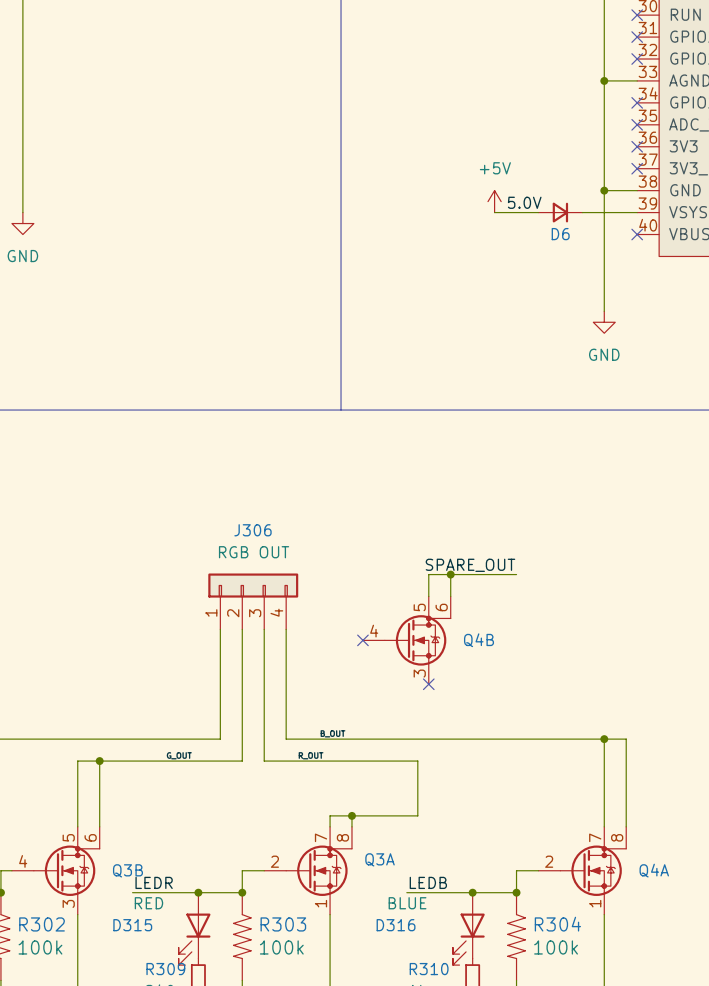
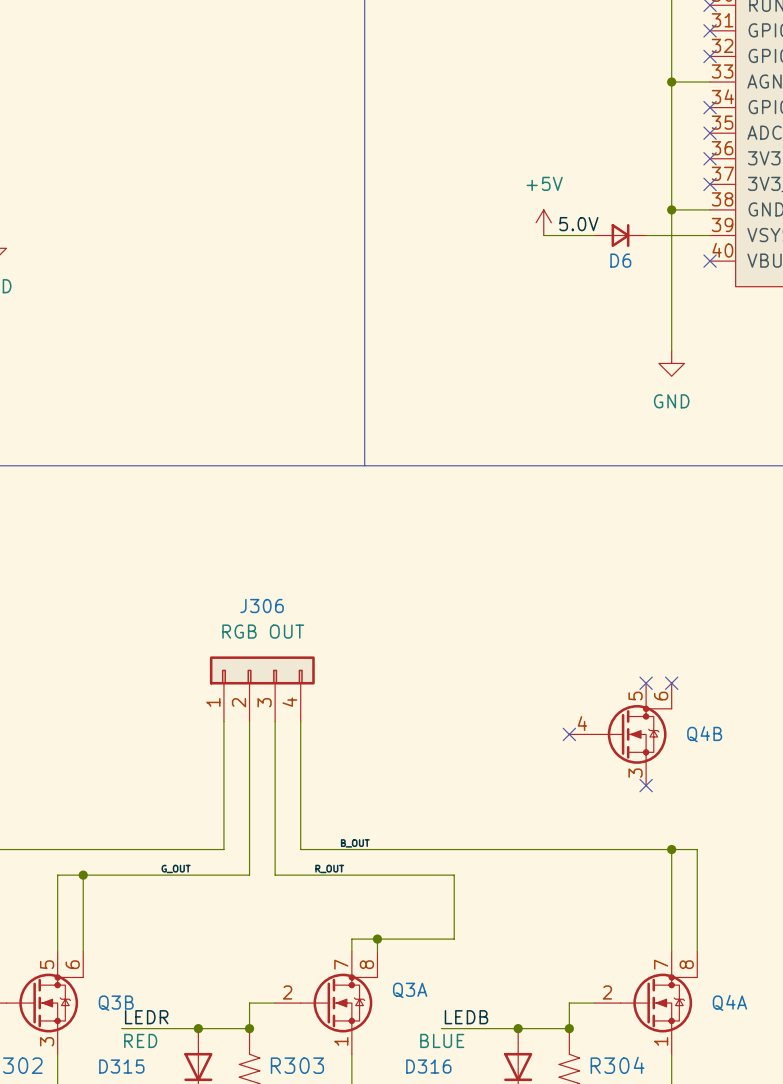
label: SPARE_OUT (470, 565) -> none
wire: (450, 574) (450, 596) -> none
junction: (450, 574) -> none
wire: (516, 574) (428, 574) (428, 596) -> none
no-connect mark: none -> (646, 683)
no-connect mark: none -> (671, 683)
no-connect mark: (362, 640) -> none
Q4B position: (406, 640) -> (620, 734)
no-connect mark: none -> (569, 734)
no-connect mark: (428, 684) -> none
no-connect mark: none -> (646, 785)

